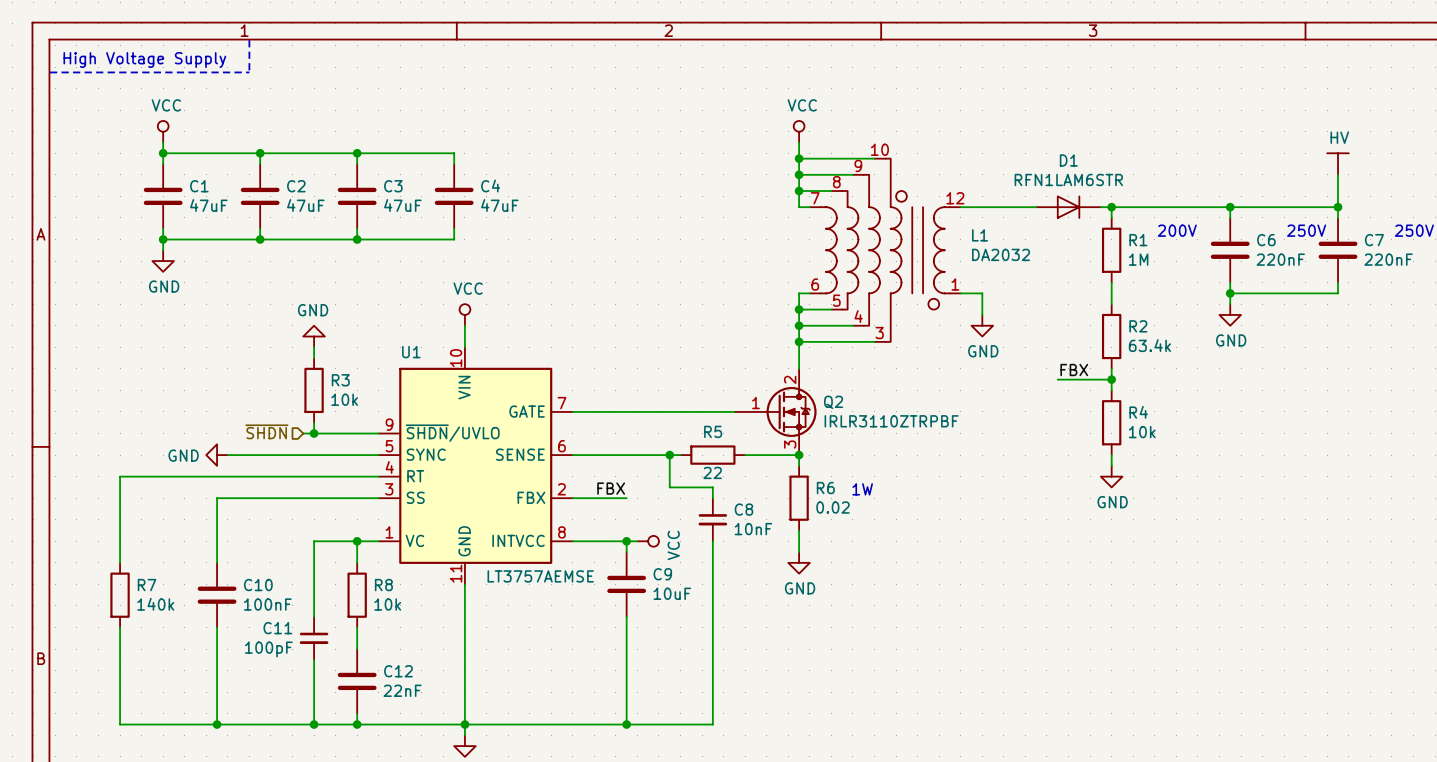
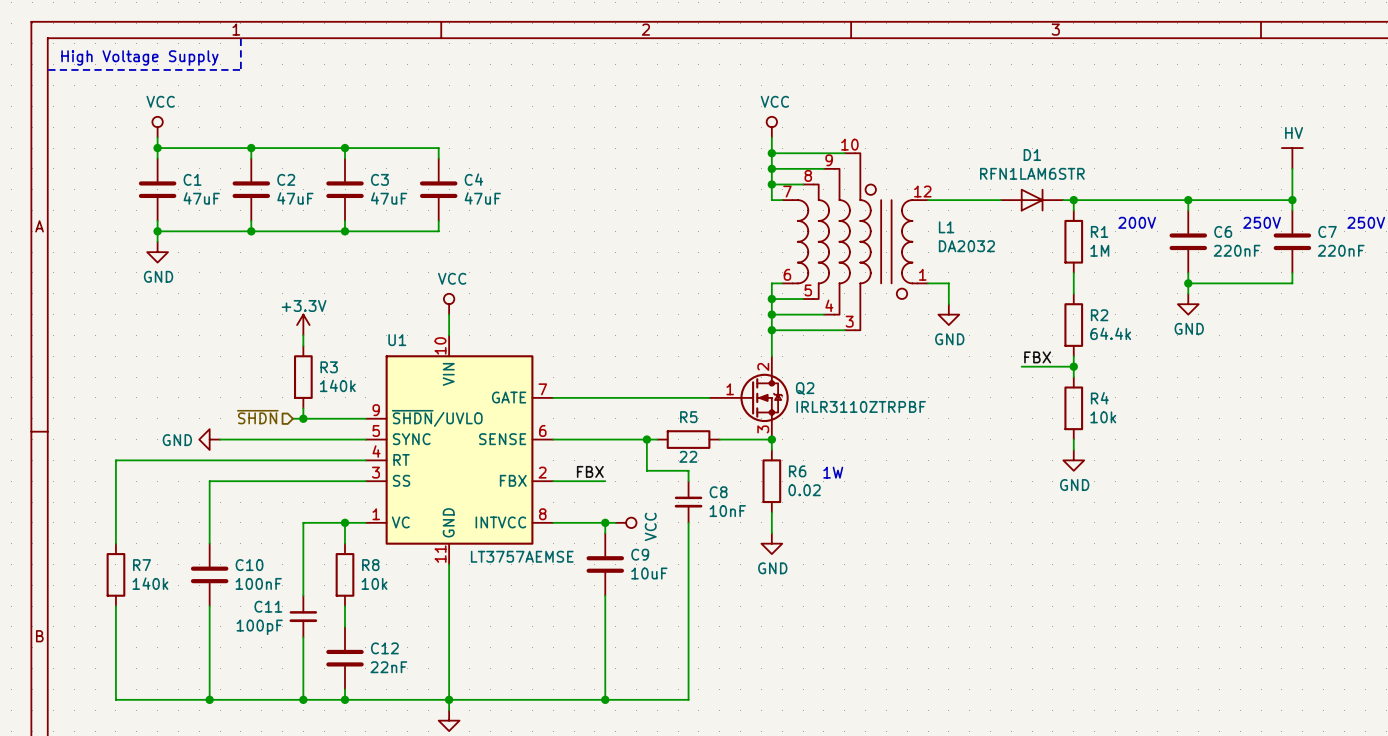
power symbol: GND (314, 336) -> +3.3V (303, 325)
R2 value: 63.4k (1149, 345) -> 64.4k (1110, 333)
R3 value: 10k (344, 399) -> 140k (337, 385)

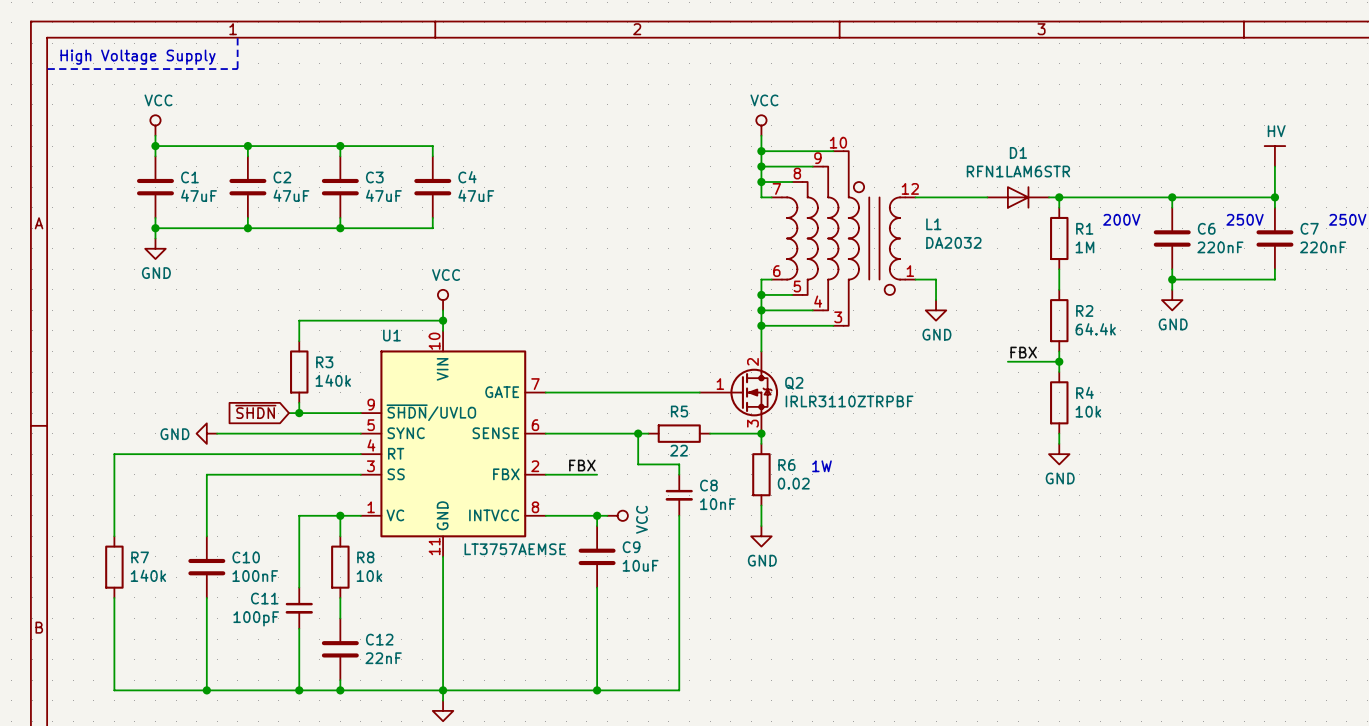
power symbol: +3.3V (303, 325) -> none
wire: none -> (443, 320) (299, 320) (299, 330)
junction: none -> (443, 320)
hierarchical label: ~{SHDN} (257, 417) -> none
global label: none -> ~{SHDN} (255, 411)

